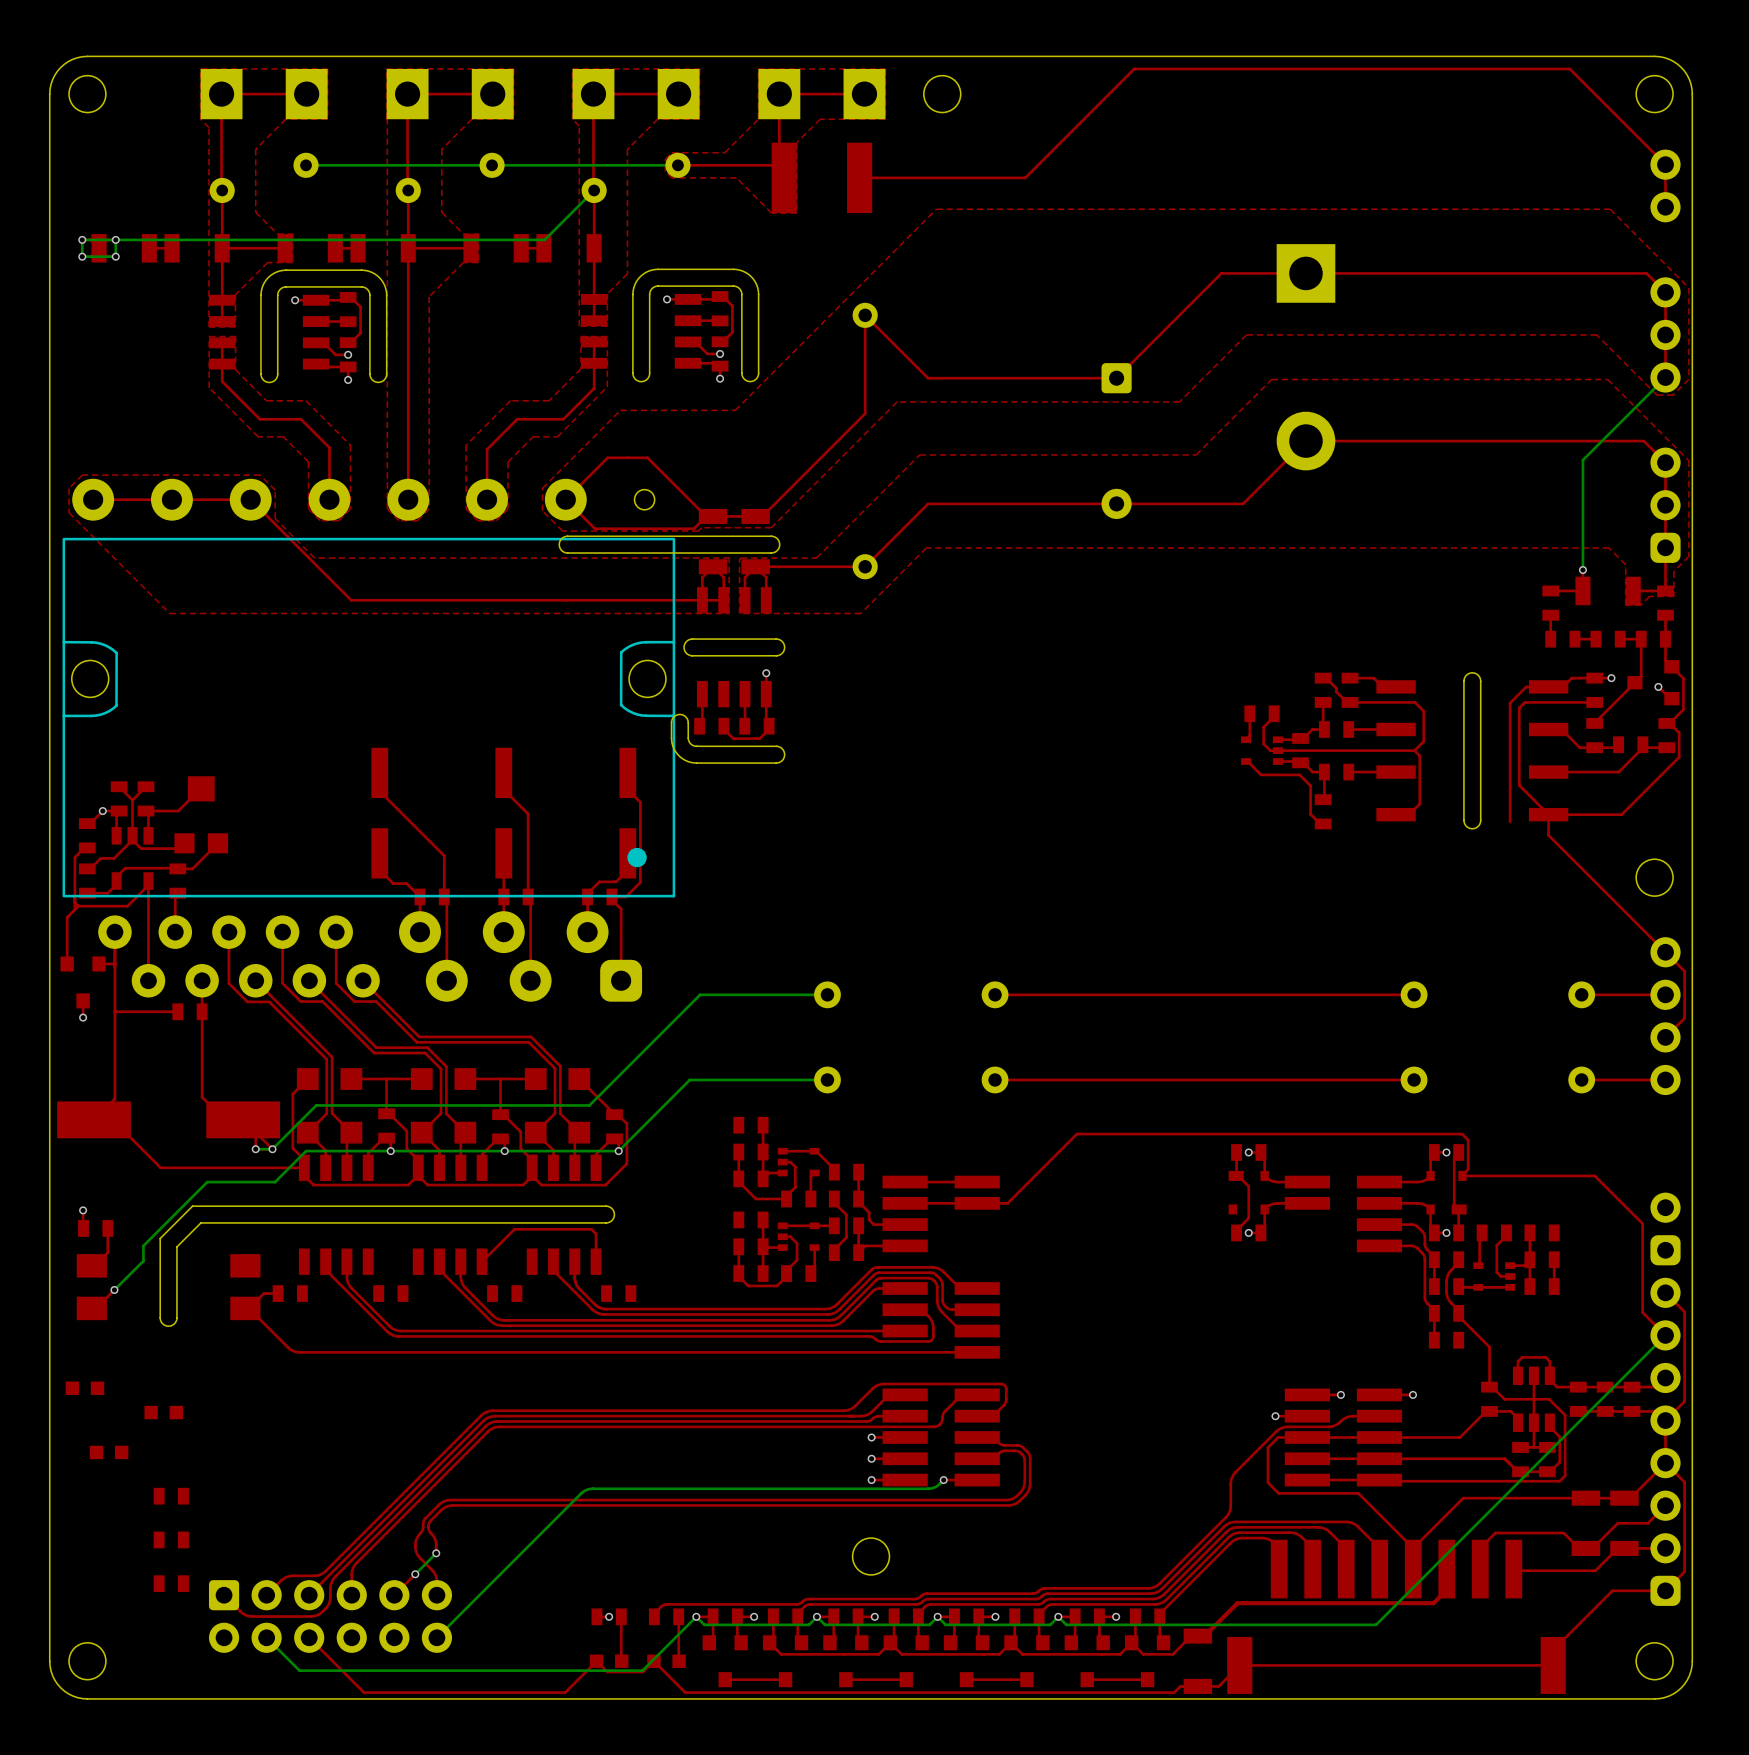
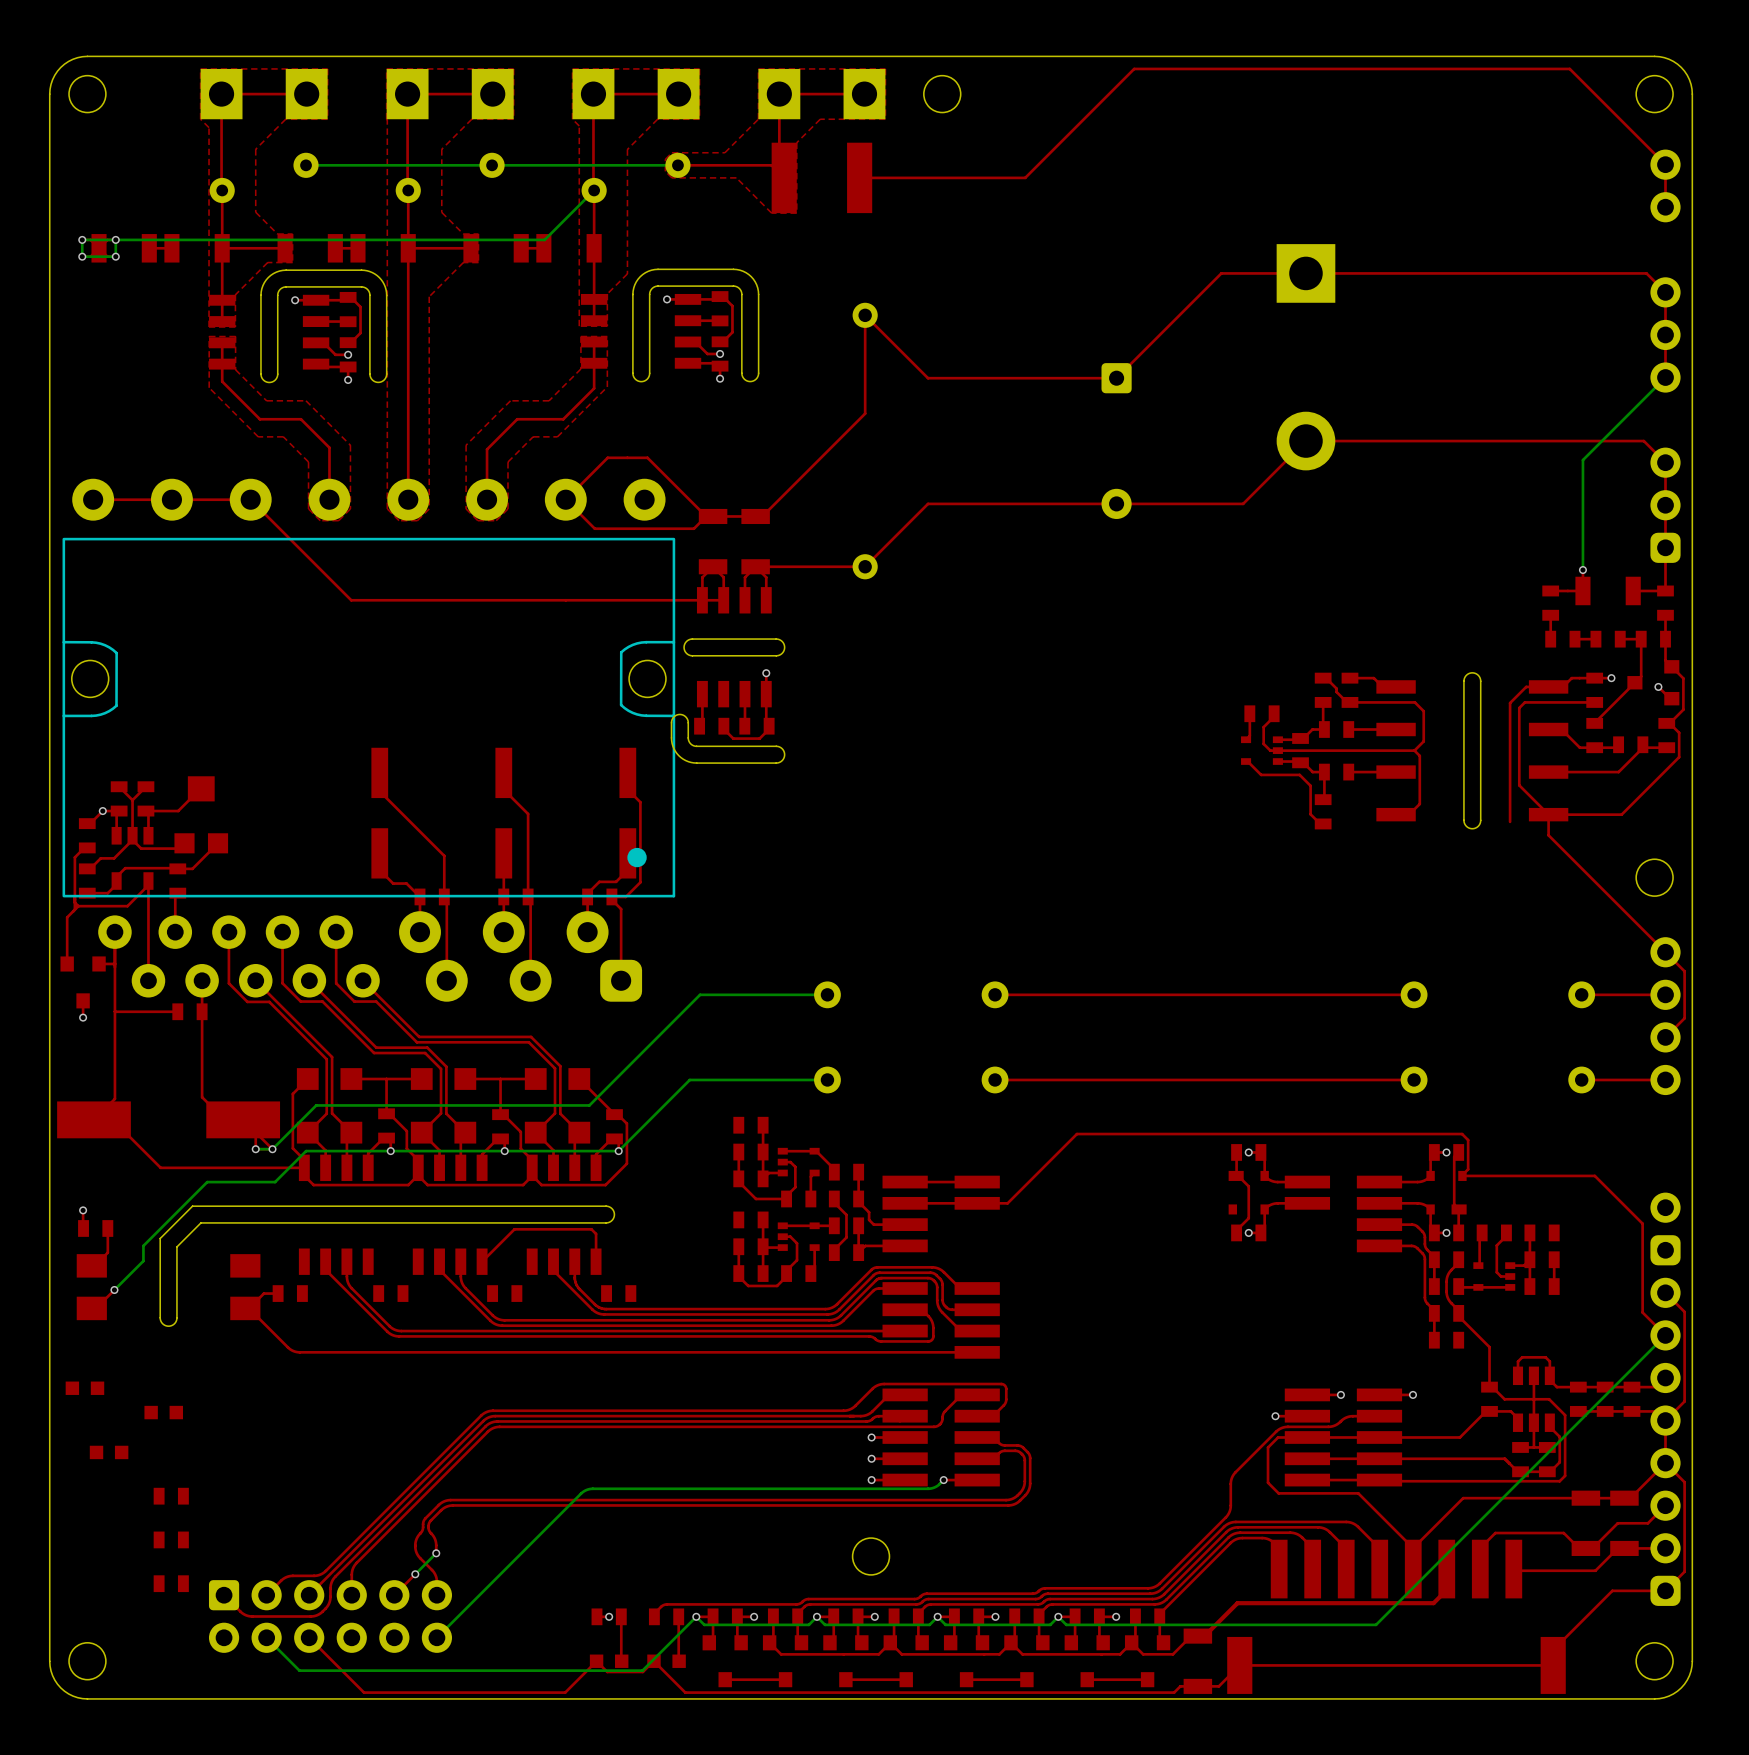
top zone outline: (1610, 209) (936, 209) (735, 410) (620, 410) (542, 488) (542, 510) (562, 531) (698, 531) (701, 527) (771, 527) (897, 401) (1179, 401) (1246, 334) (1596, 334) (1656, 395) (1673, 395) (1688, 379) (1688, 288) (1610, 209) -> none
top zone outline: (1607, 379) (1271, 379) (1196, 454) (919, 454) (816, 558) (740, 558) (739, 613) (860, 613) (926, 547) (1608, 547) (1625, 564) (1625, 605) (1640, 605) (1649, 596) (1673, 596) (1673, 571) (1688, 556) (1688, 460) (1607, 379) -> none
top zone outline: (260, 475) (275, 490) (275, 518) (314, 558) (729, 557) (729, 613) (169, 613) (69, 512) (69, 488) (82, 475) (260, 475) -> none
part footprint: [62, 478, 676, 1002] -> [62, 478, 676, 1002]
board edge: (771, 536) (567, 536) (561, 538) (559, 544) (561, 550) (567, 553) (771, 553) (777, 550) (779, 544) (777, 538) (771, 536) -> none

